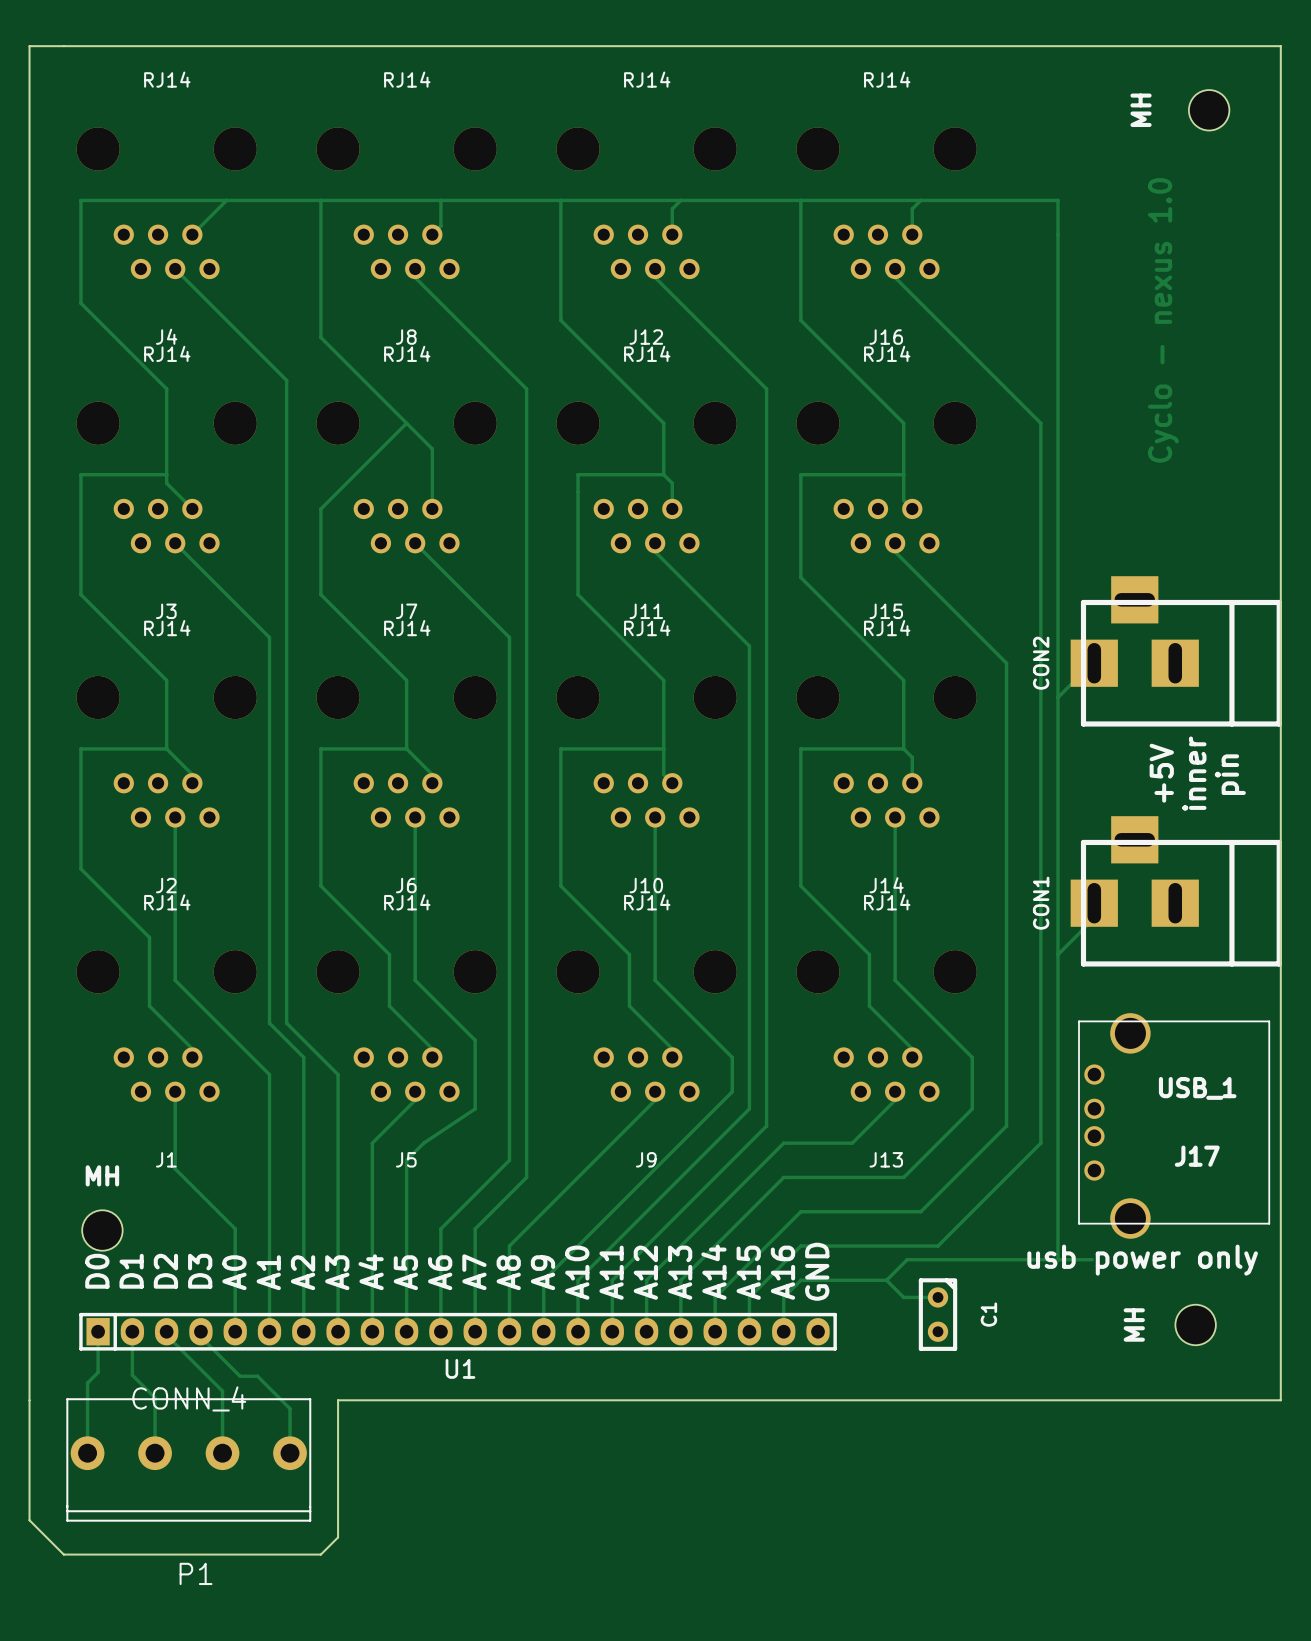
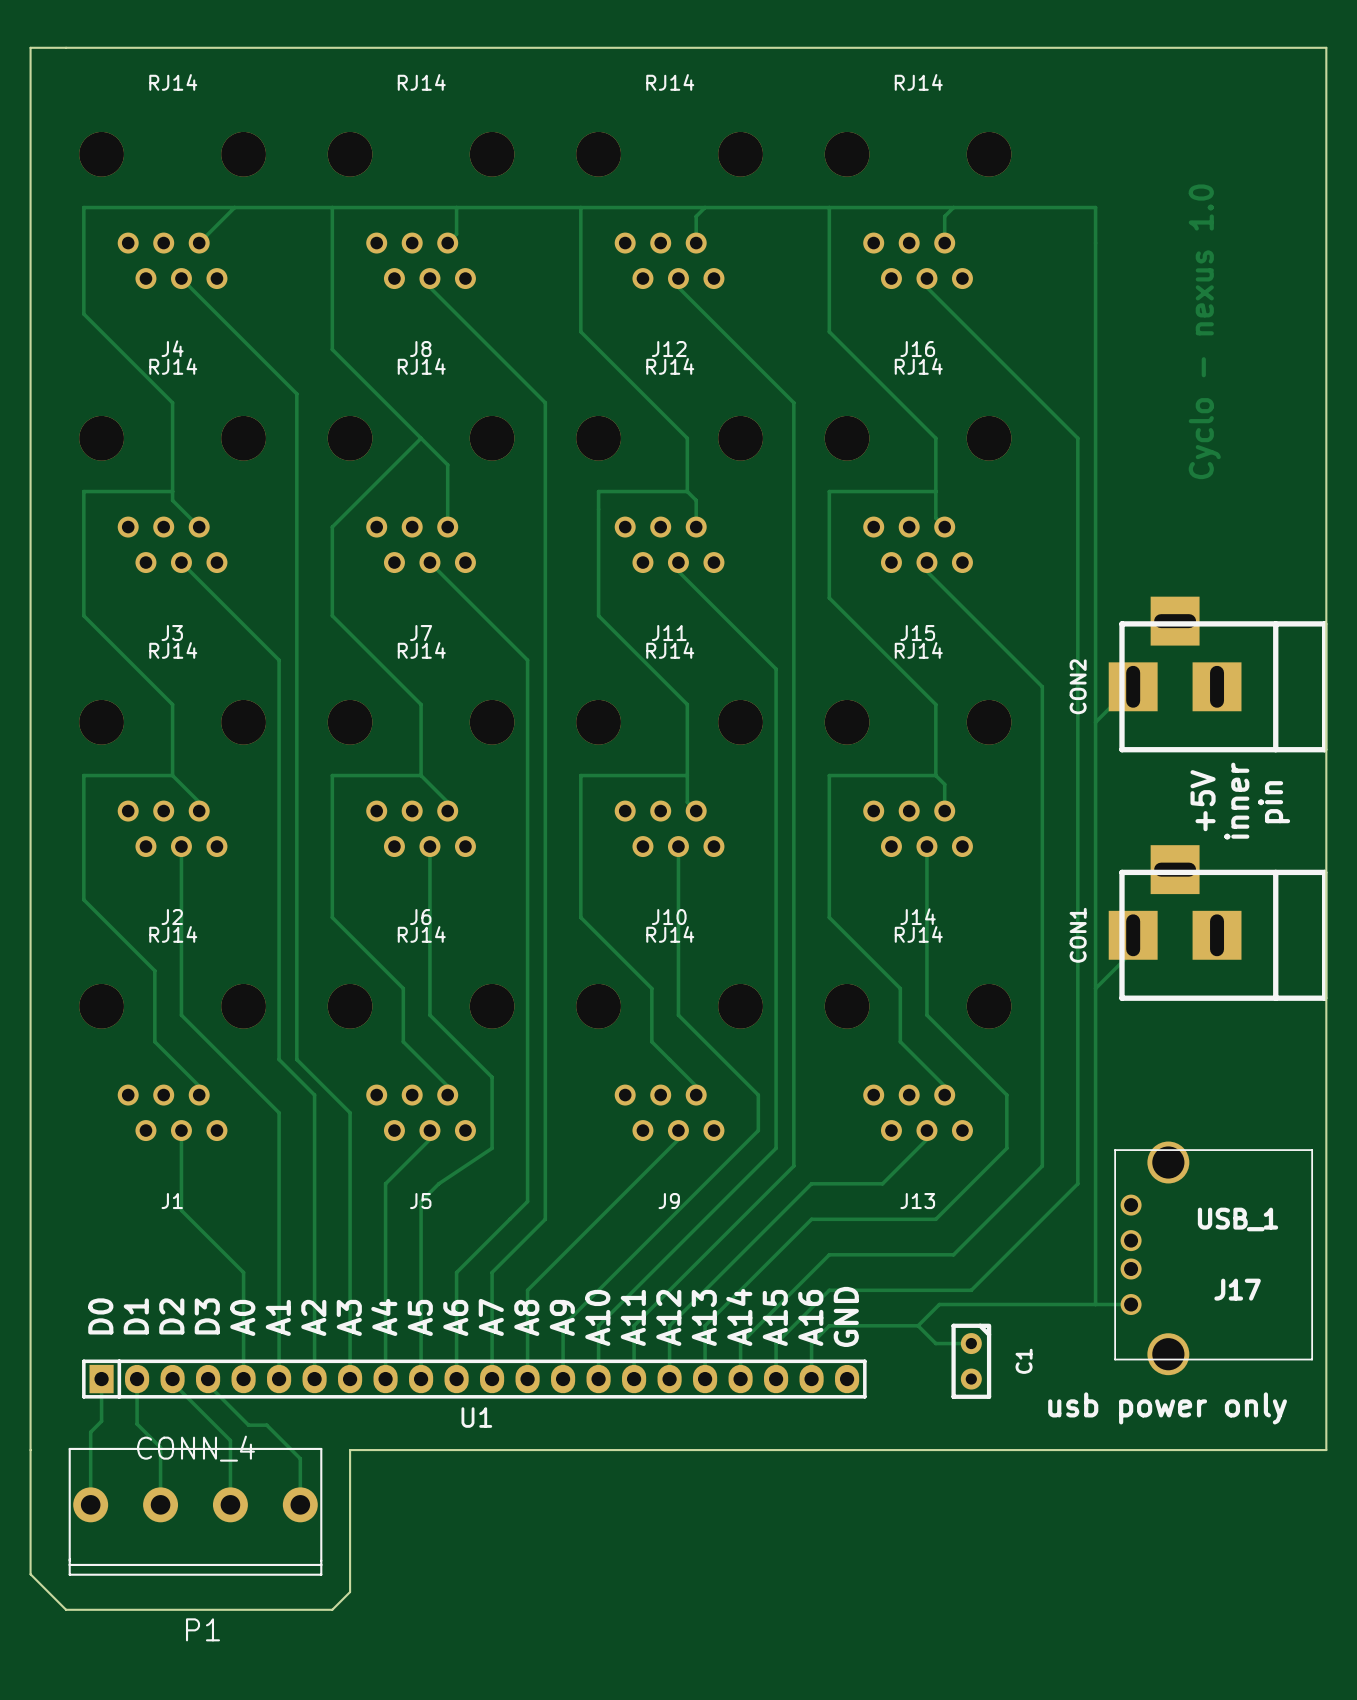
MH: (1209, 110) -> none
J17 position: (1174, 1125) -> (1213, 1258)
MH: (102, 1230) -> none
text position: usb power only (1142, 1260) -> usb power only (1167, 1408)
MH: (1195, 1324) -> none

